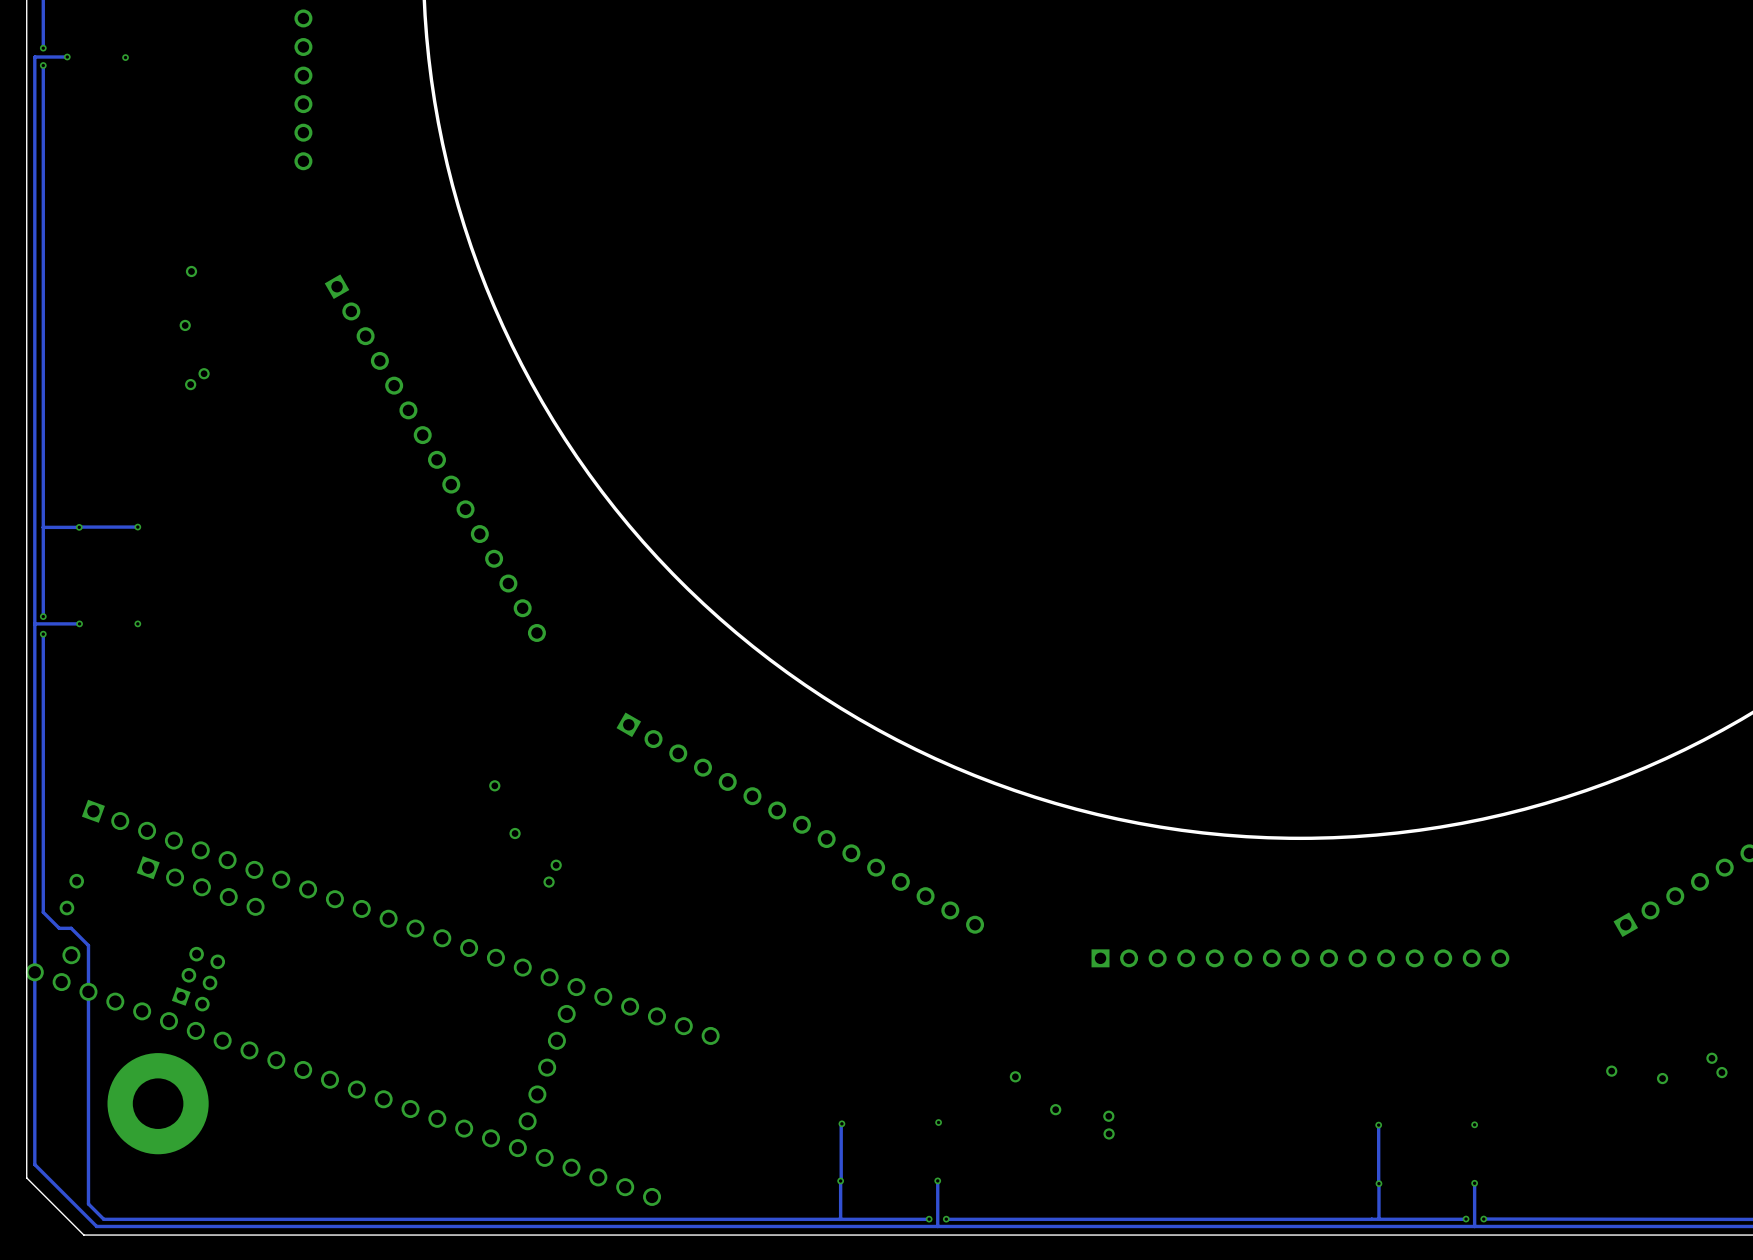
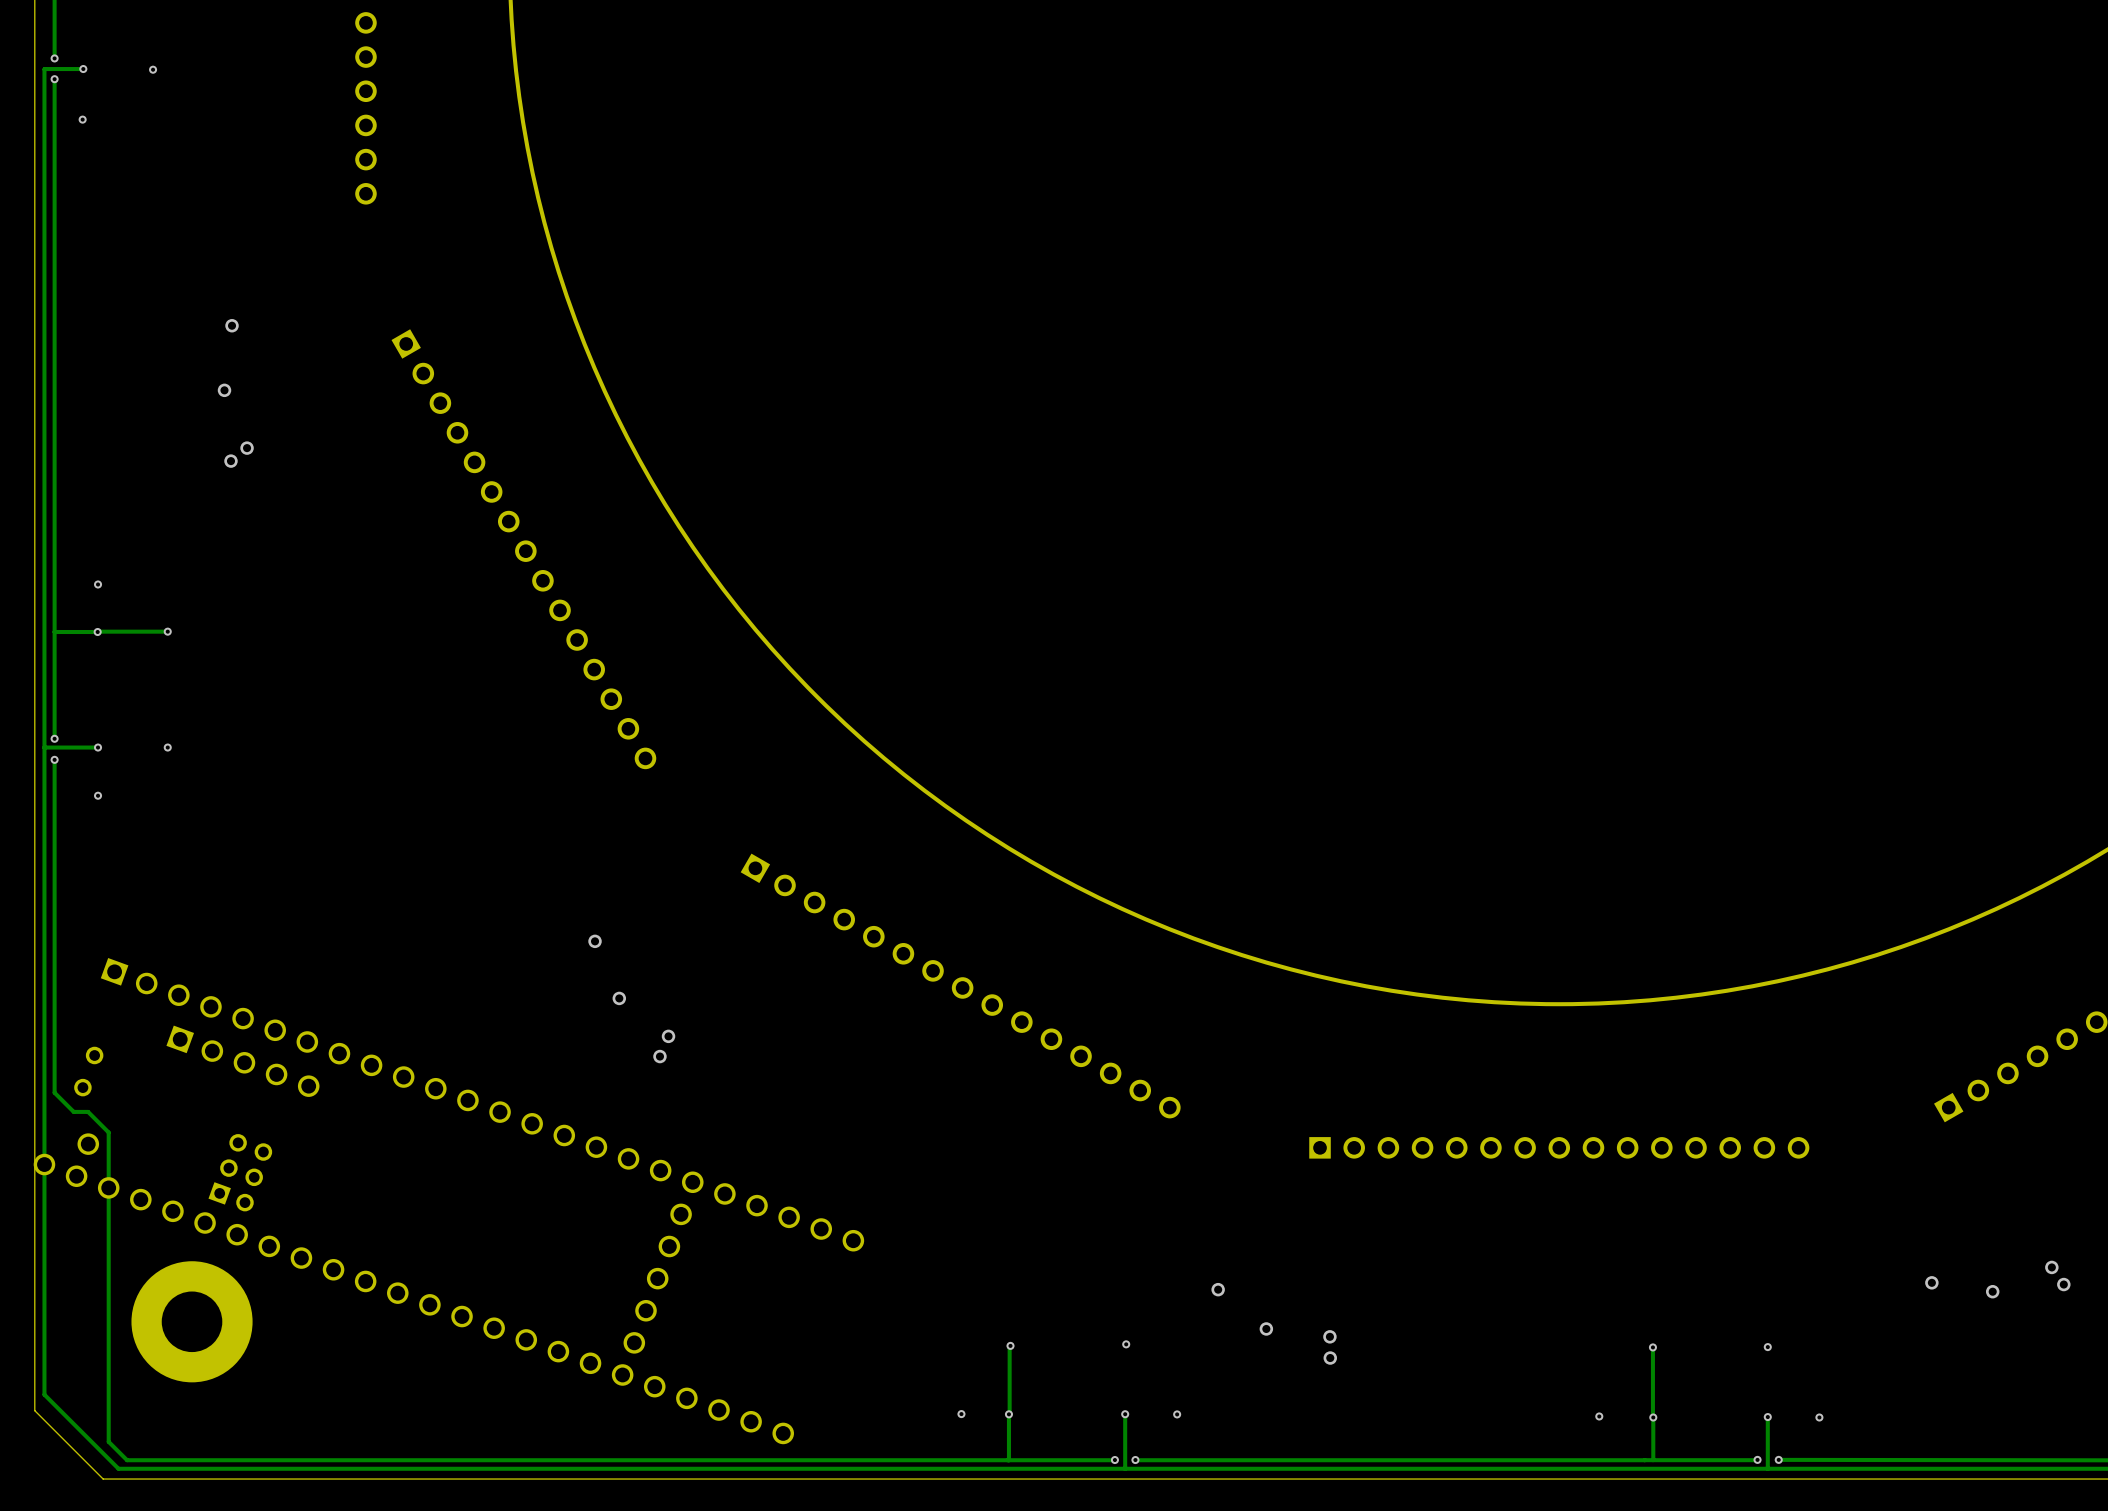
via: none -> (82, 119)
via: none -> (98, 584)
via: none -> (98, 795)
via: none -> (961, 1414)
via: none -> (1177, 1414)
via: none -> (1599, 1416)
via: none -> (1819, 1417)

